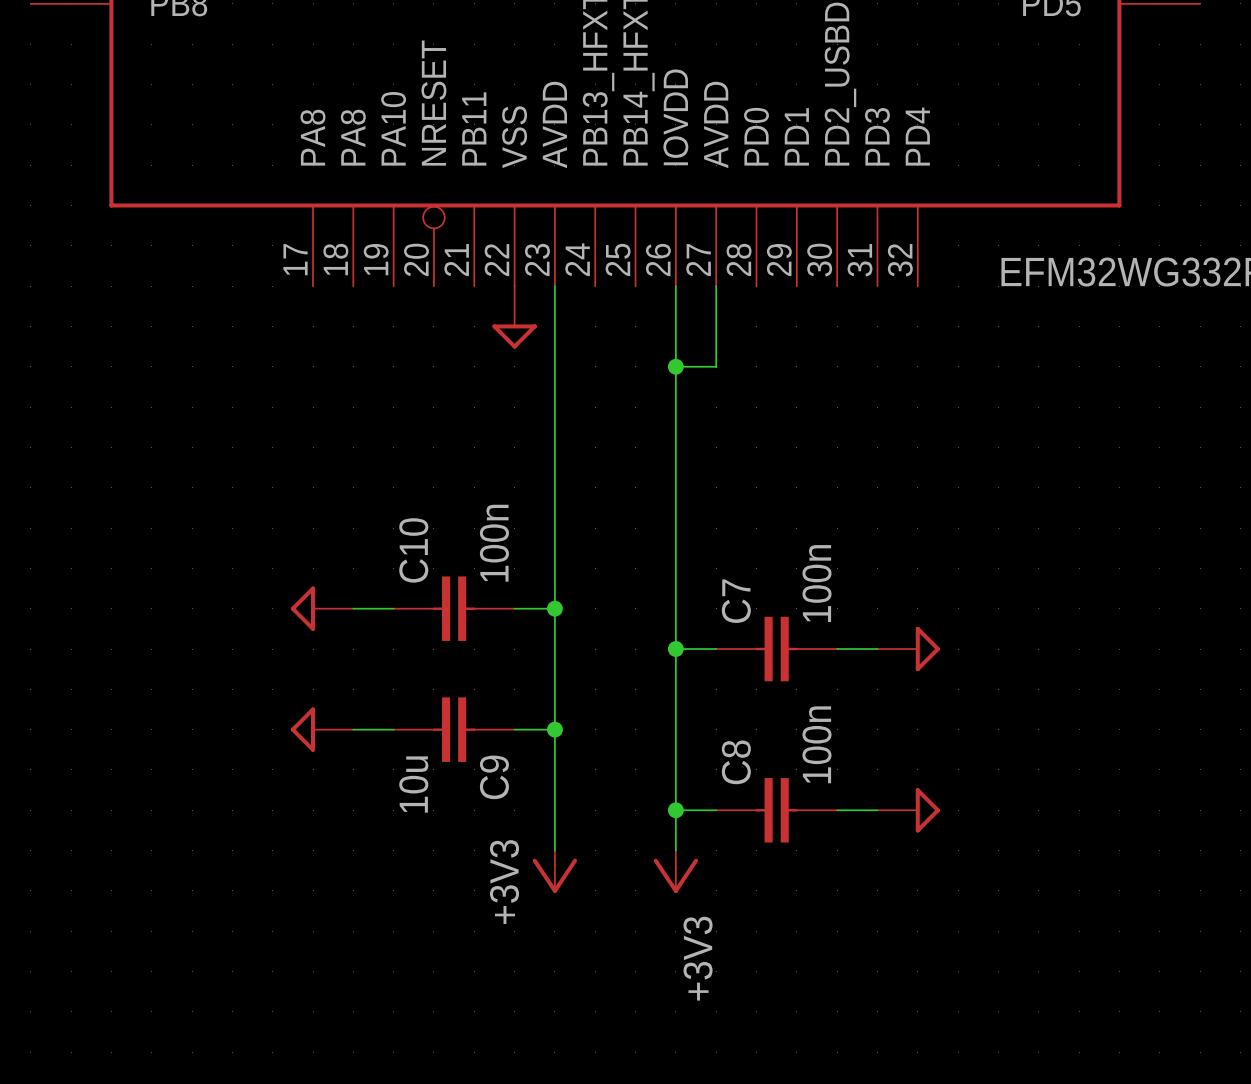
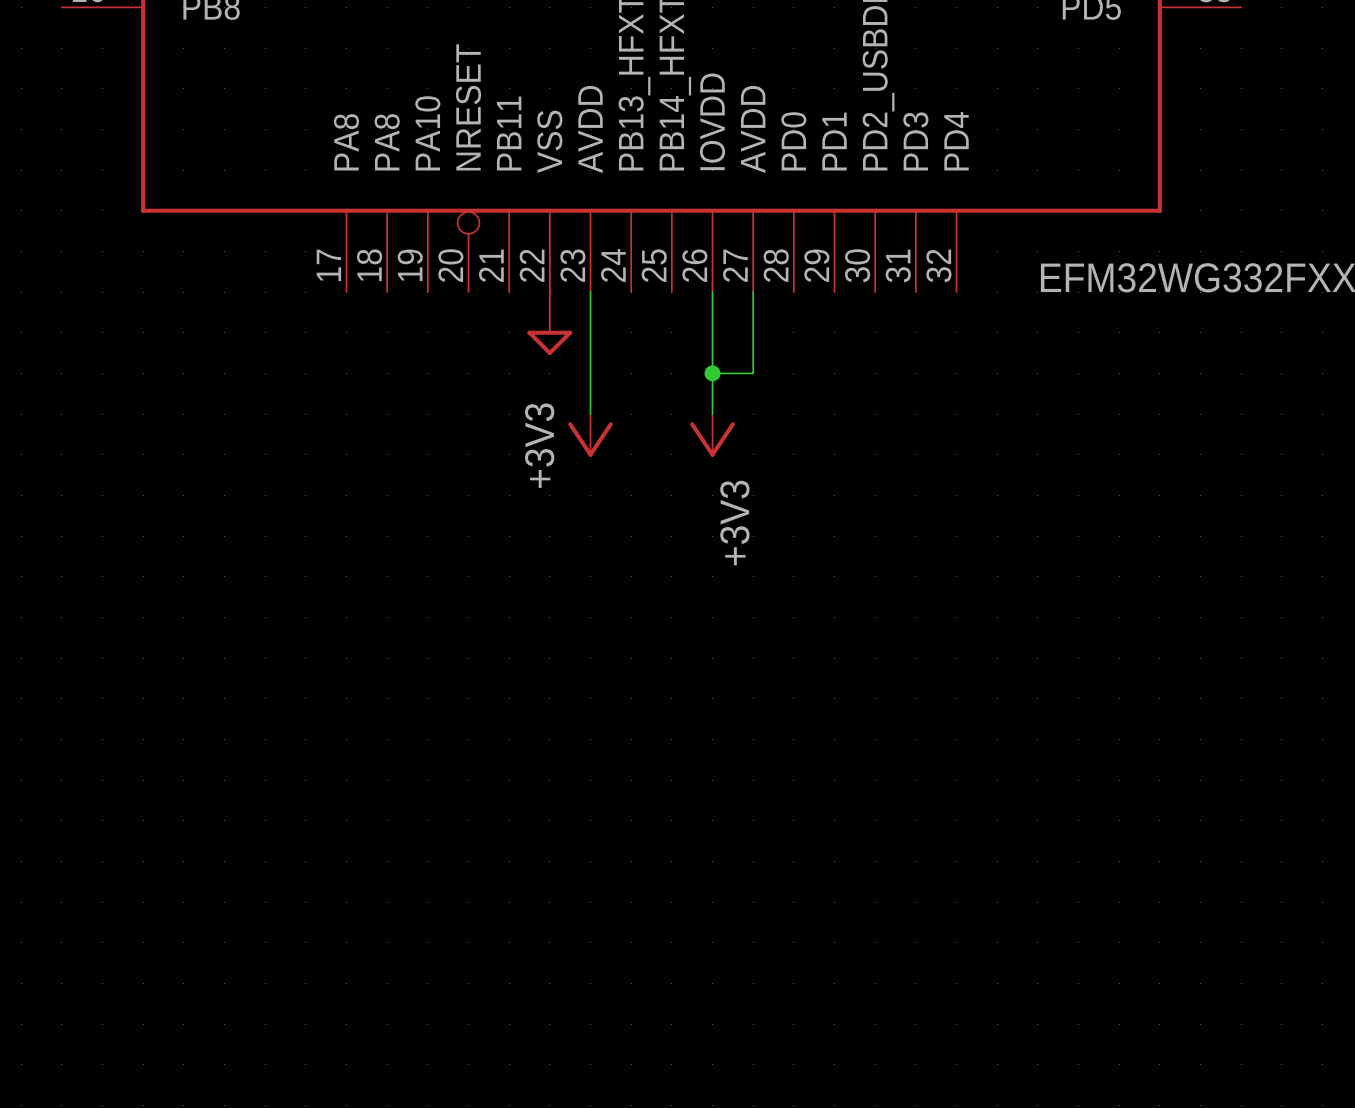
wire: (554, 407) (554, 850) -> none
wire: (675, 407) (675, 850) -> none
power symbol: none -> +3V3 (590, 435)
power symbol: none -> +3V3 (712, 435)
power symbol: (322, 608) -> none
wire: (353, 608) (393, 608) -> none
C10: 100n (454, 608) -> none
wire: (514, 608) (554, 608) -> none
junction: (554, 608) -> none
wire: (675, 649) (716, 649) -> none
junction: (675, 649) -> none
C7: 100n (776, 649) -> none
wire: (837, 649) (877, 649) -> none
power symbol: (908, 649) -> none
power symbol: (322, 729) -> none
wire: (353, 729) (393, 729) -> none
C9: 10u (454, 729) -> none
wire: (514, 729) (554, 729) -> none
junction: (554, 729) -> none
wire: (675, 810) (716, 810) -> none
junction: (675, 810) -> none
C8: 100n (776, 810) -> none
wire: (837, 810) (877, 810) -> none
power symbol: (908, 810) -> none
power symbol: +3V3 (554, 871) -> none
power symbol: +3V3 (675, 871) -> none

